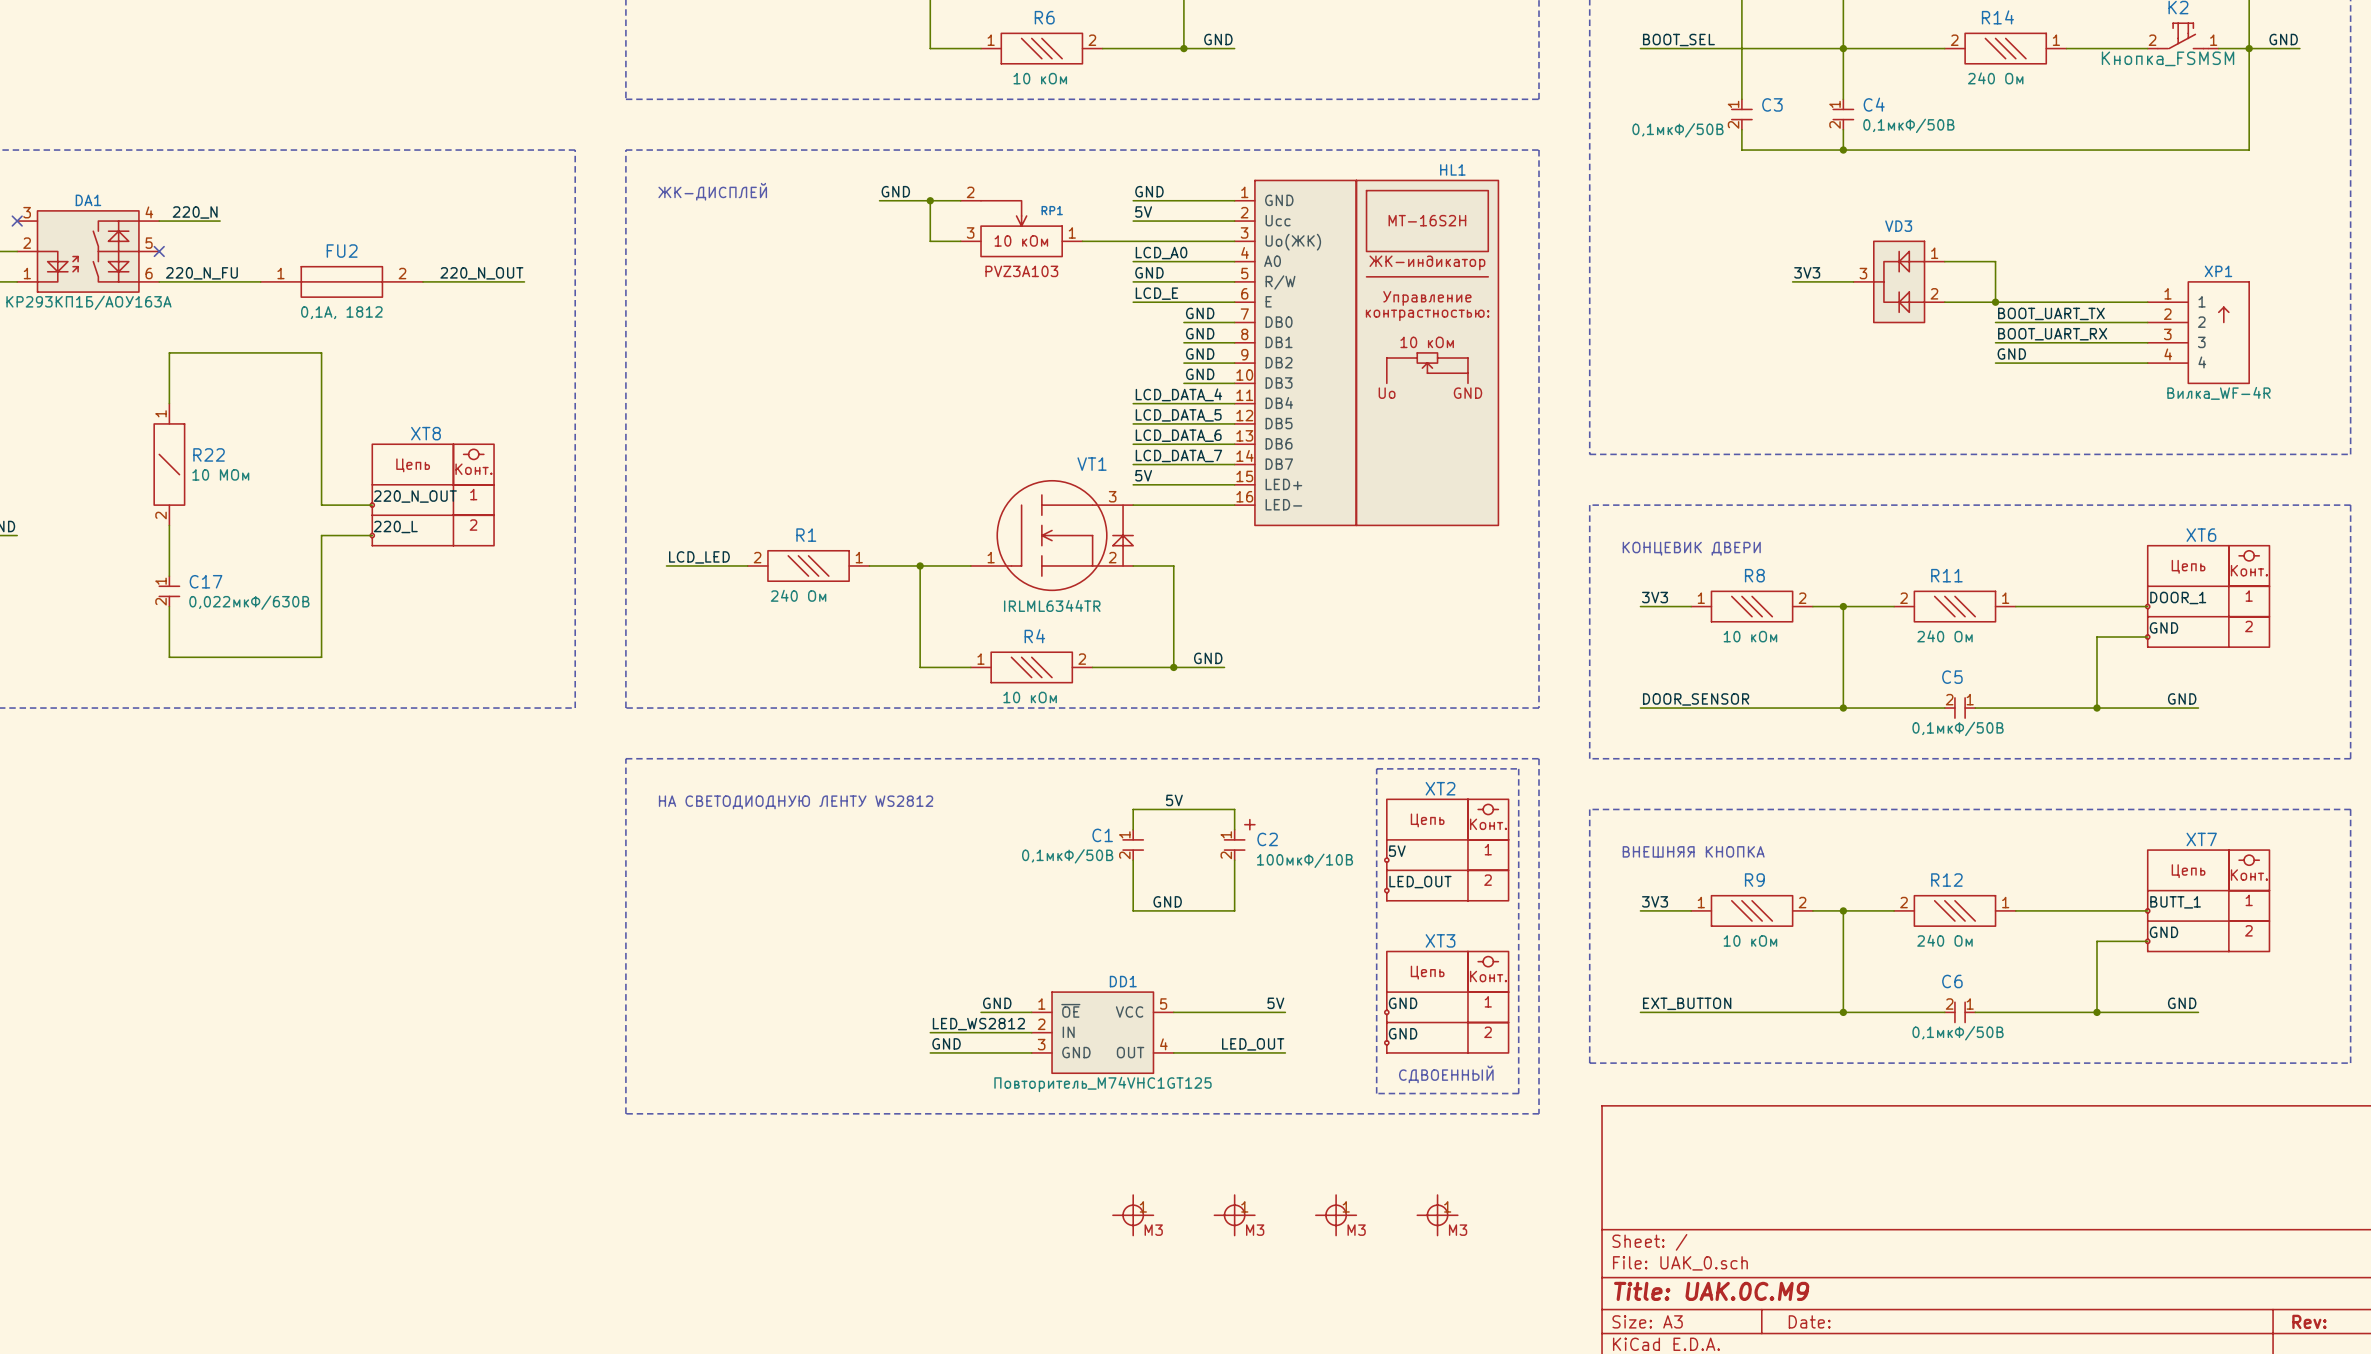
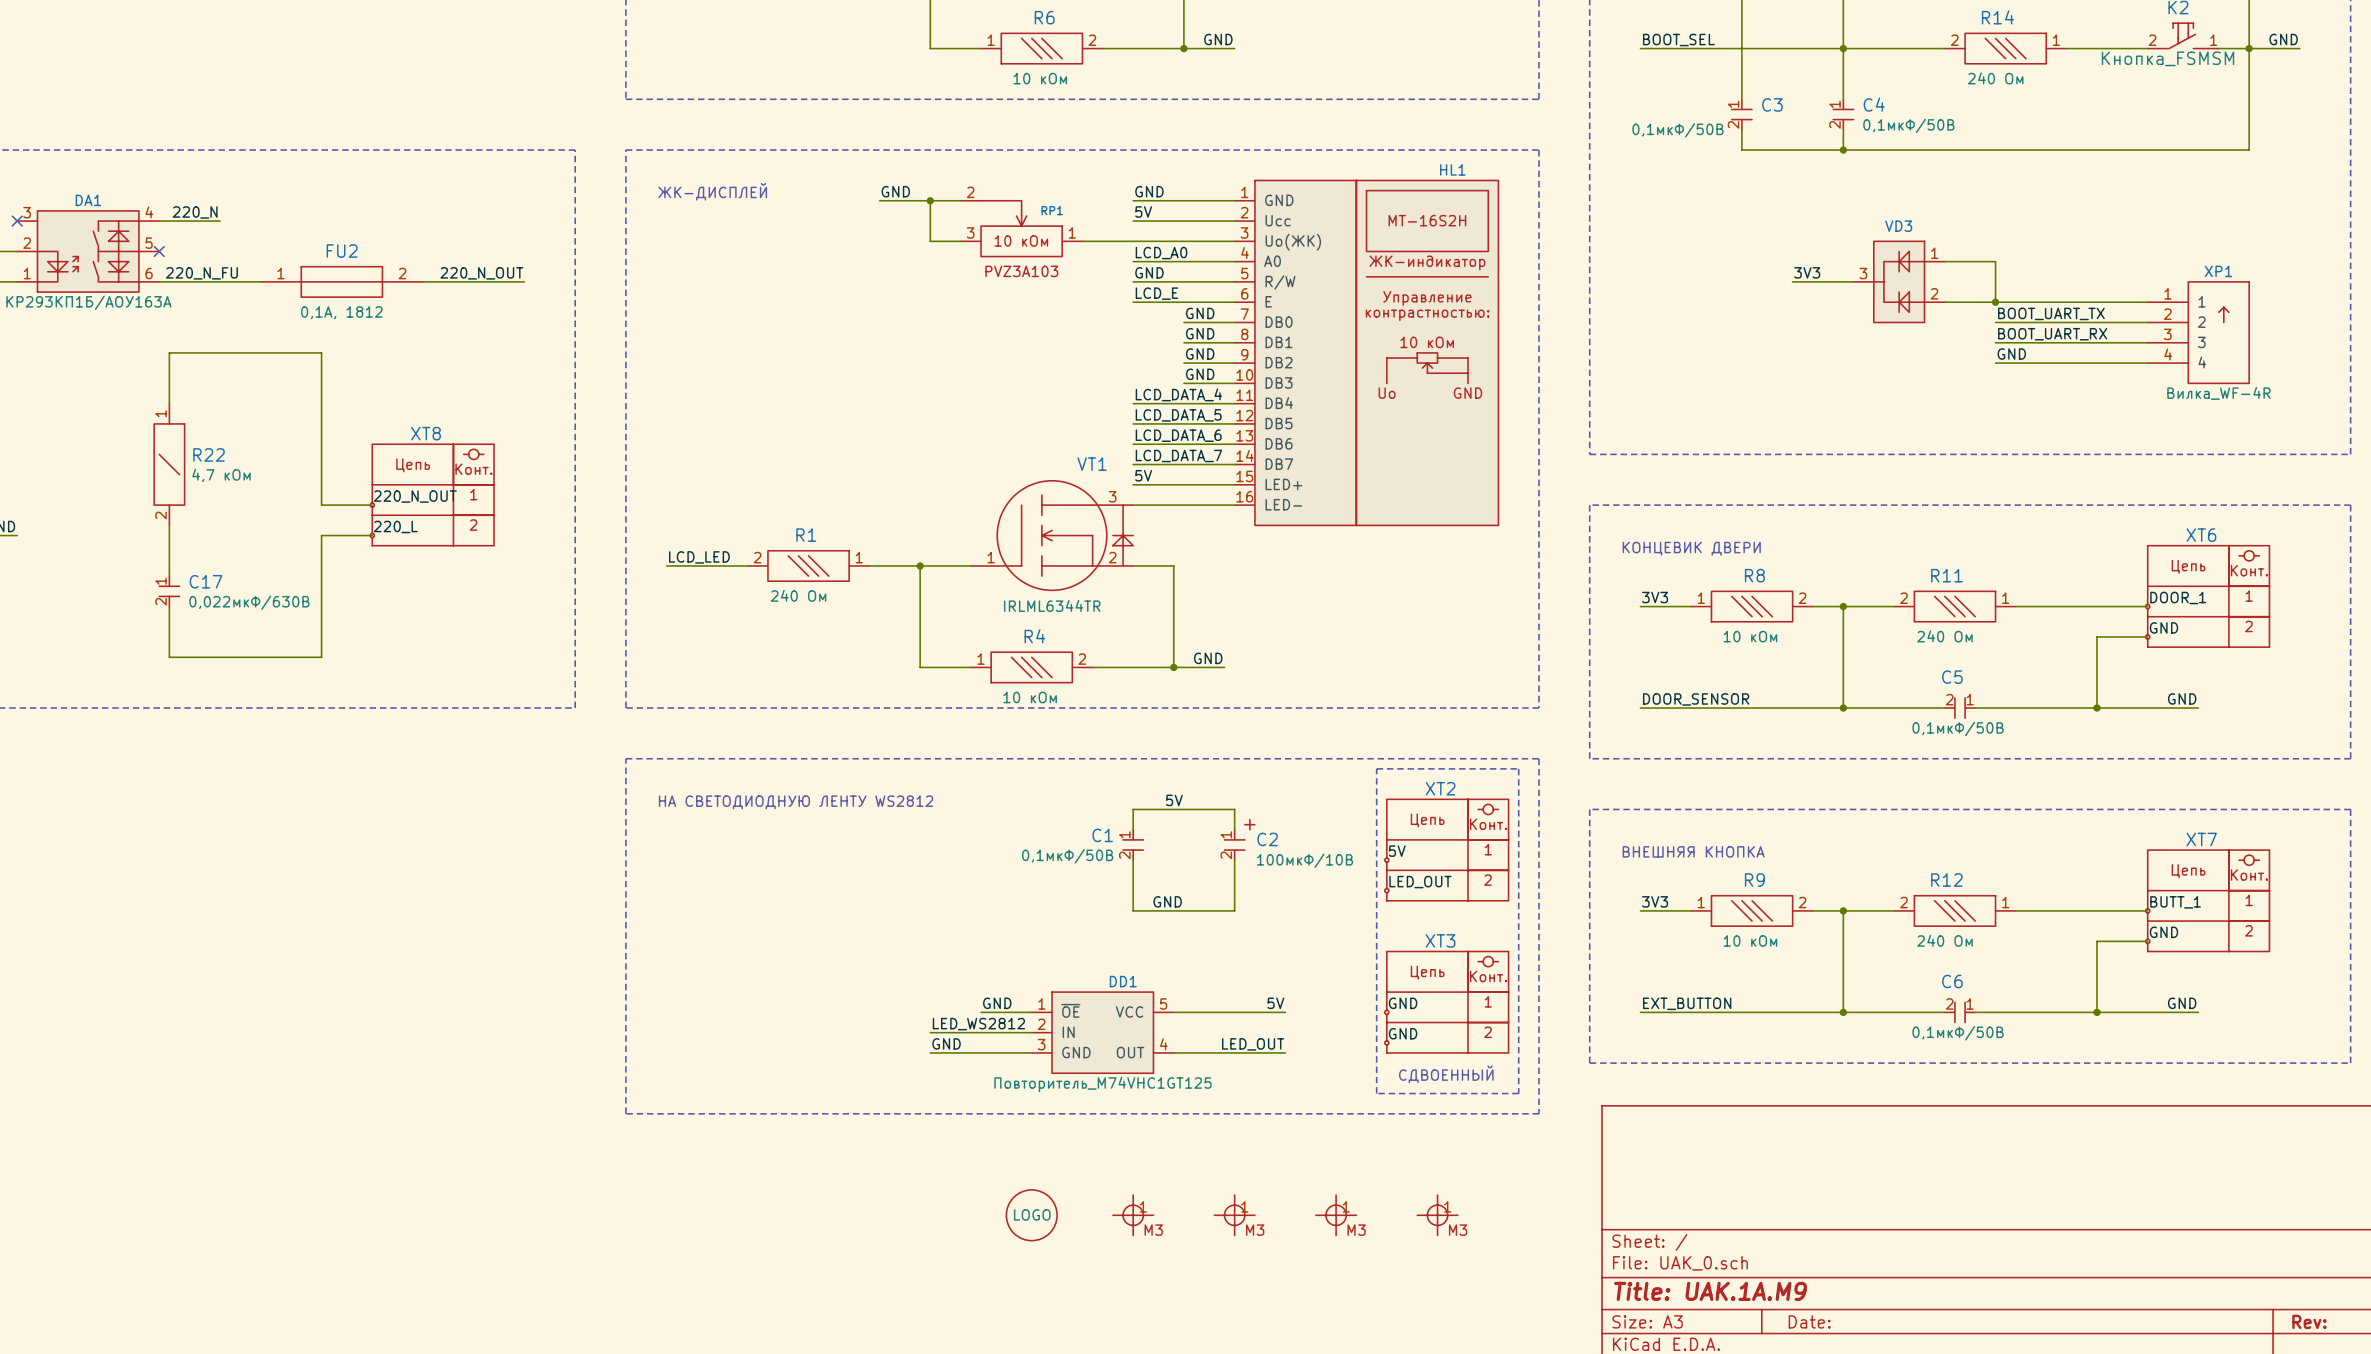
R22 text: 10 МОм (220, 474) -> 4,7 кОм (221, 475)
part: none -> LOGO (1031, 1215)
title block: Title: UAK.0C.M9 (1711, 1291) -> Title: UAK.1A.M9 (1710, 1291)

